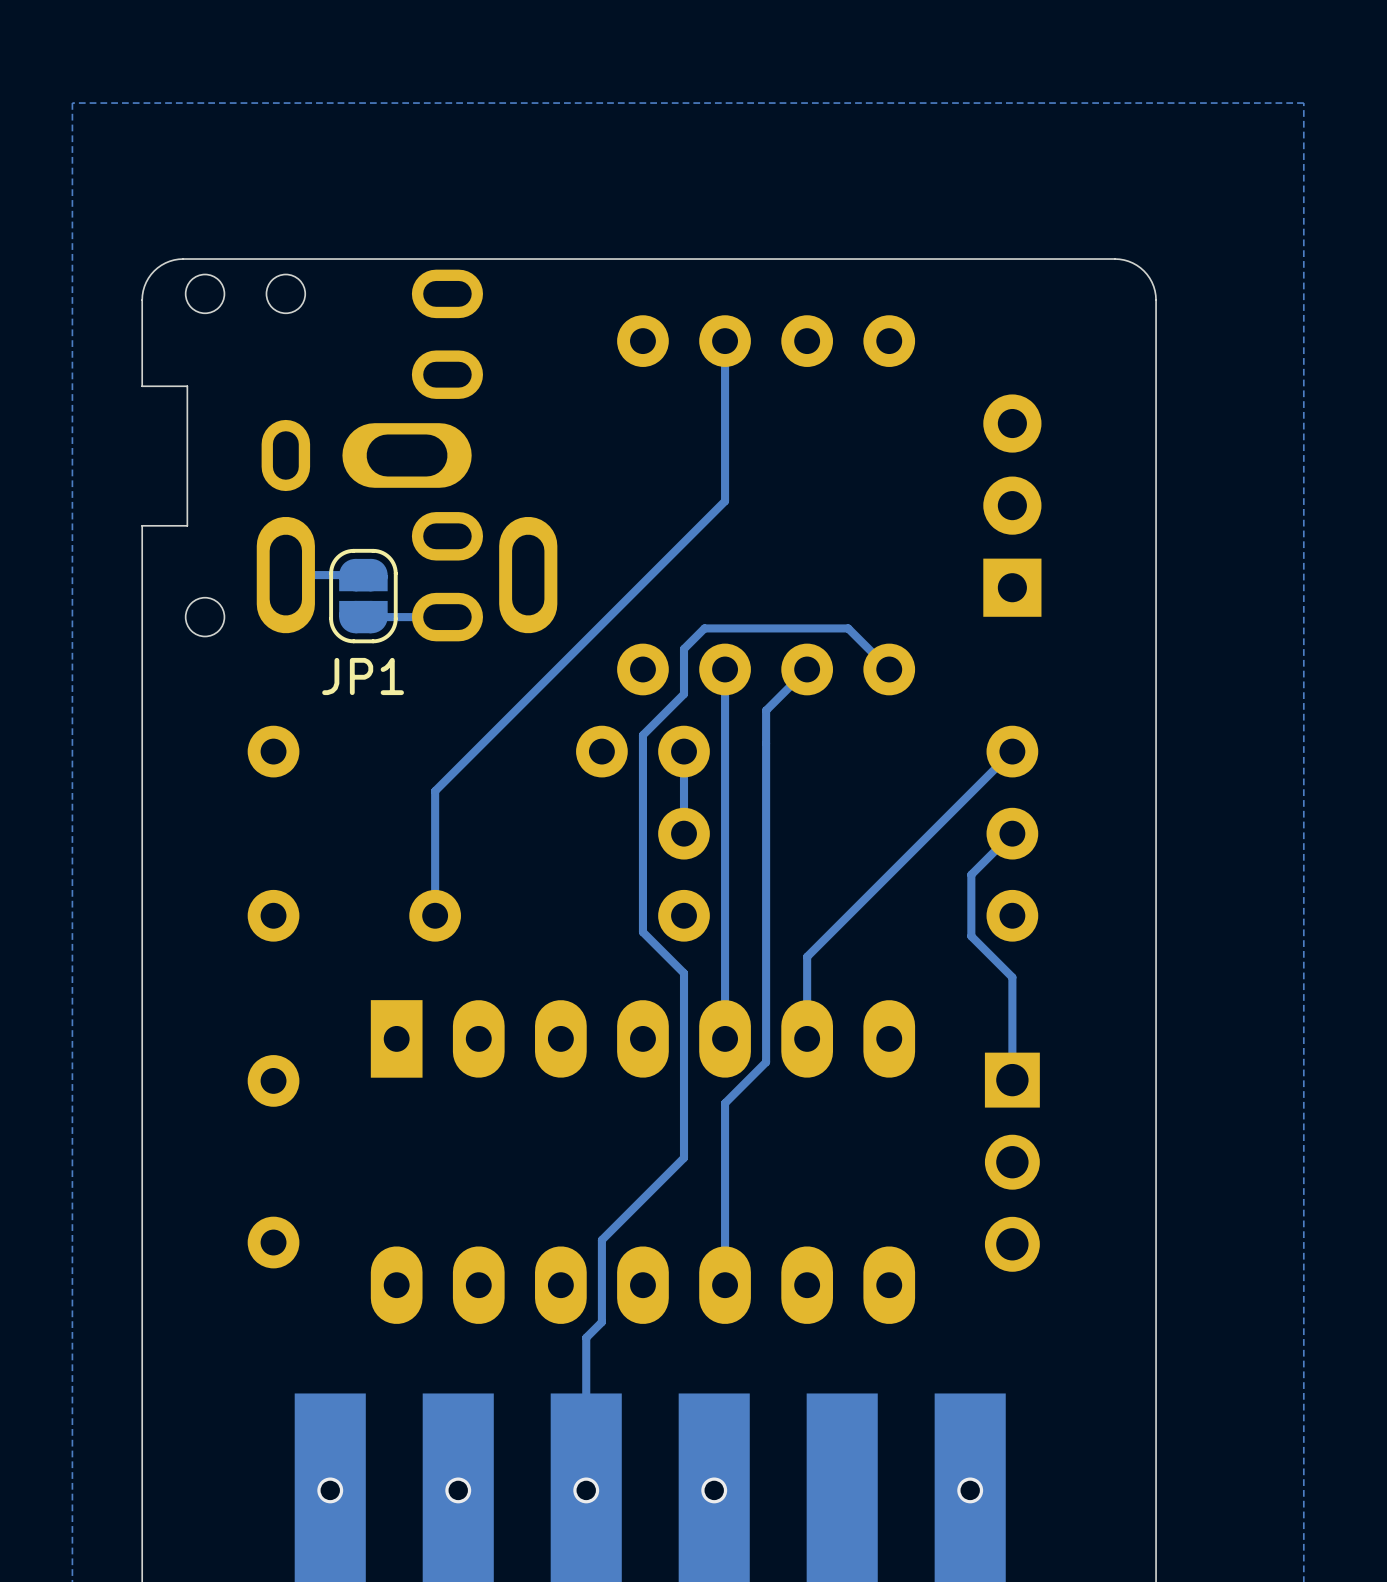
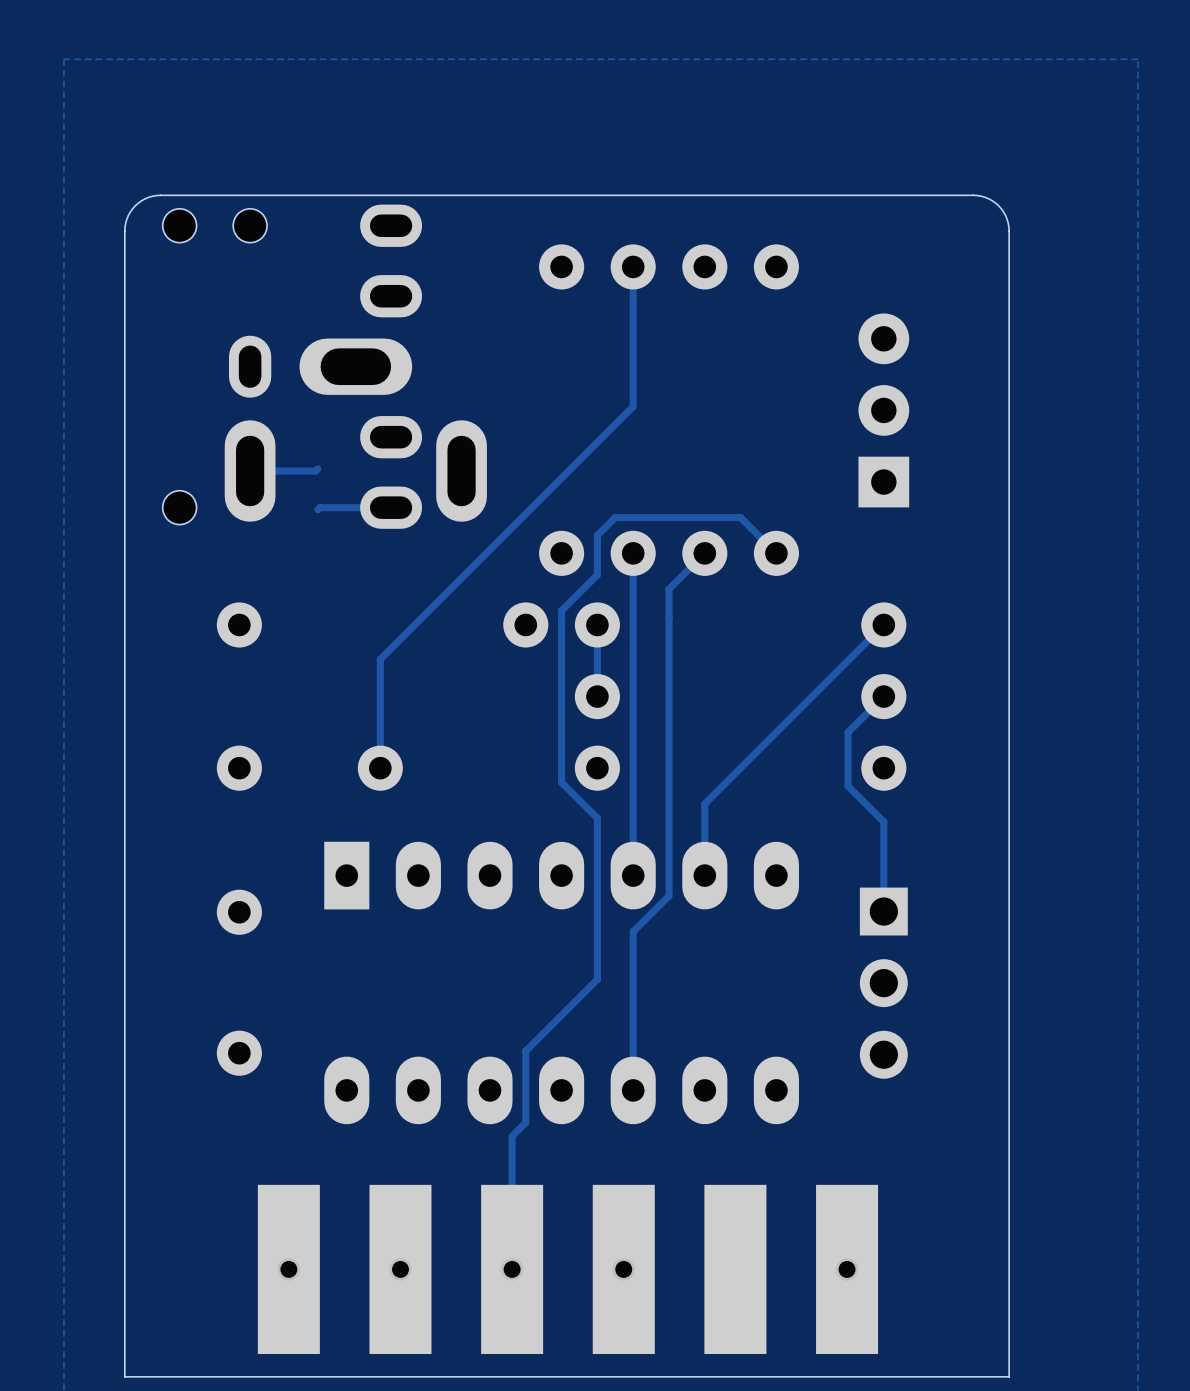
board edge: (142, 386) (187, 386) (187, 525) (142, 525) -> (124, 306) (124, 428)
JP1: (363, 596) -> none

